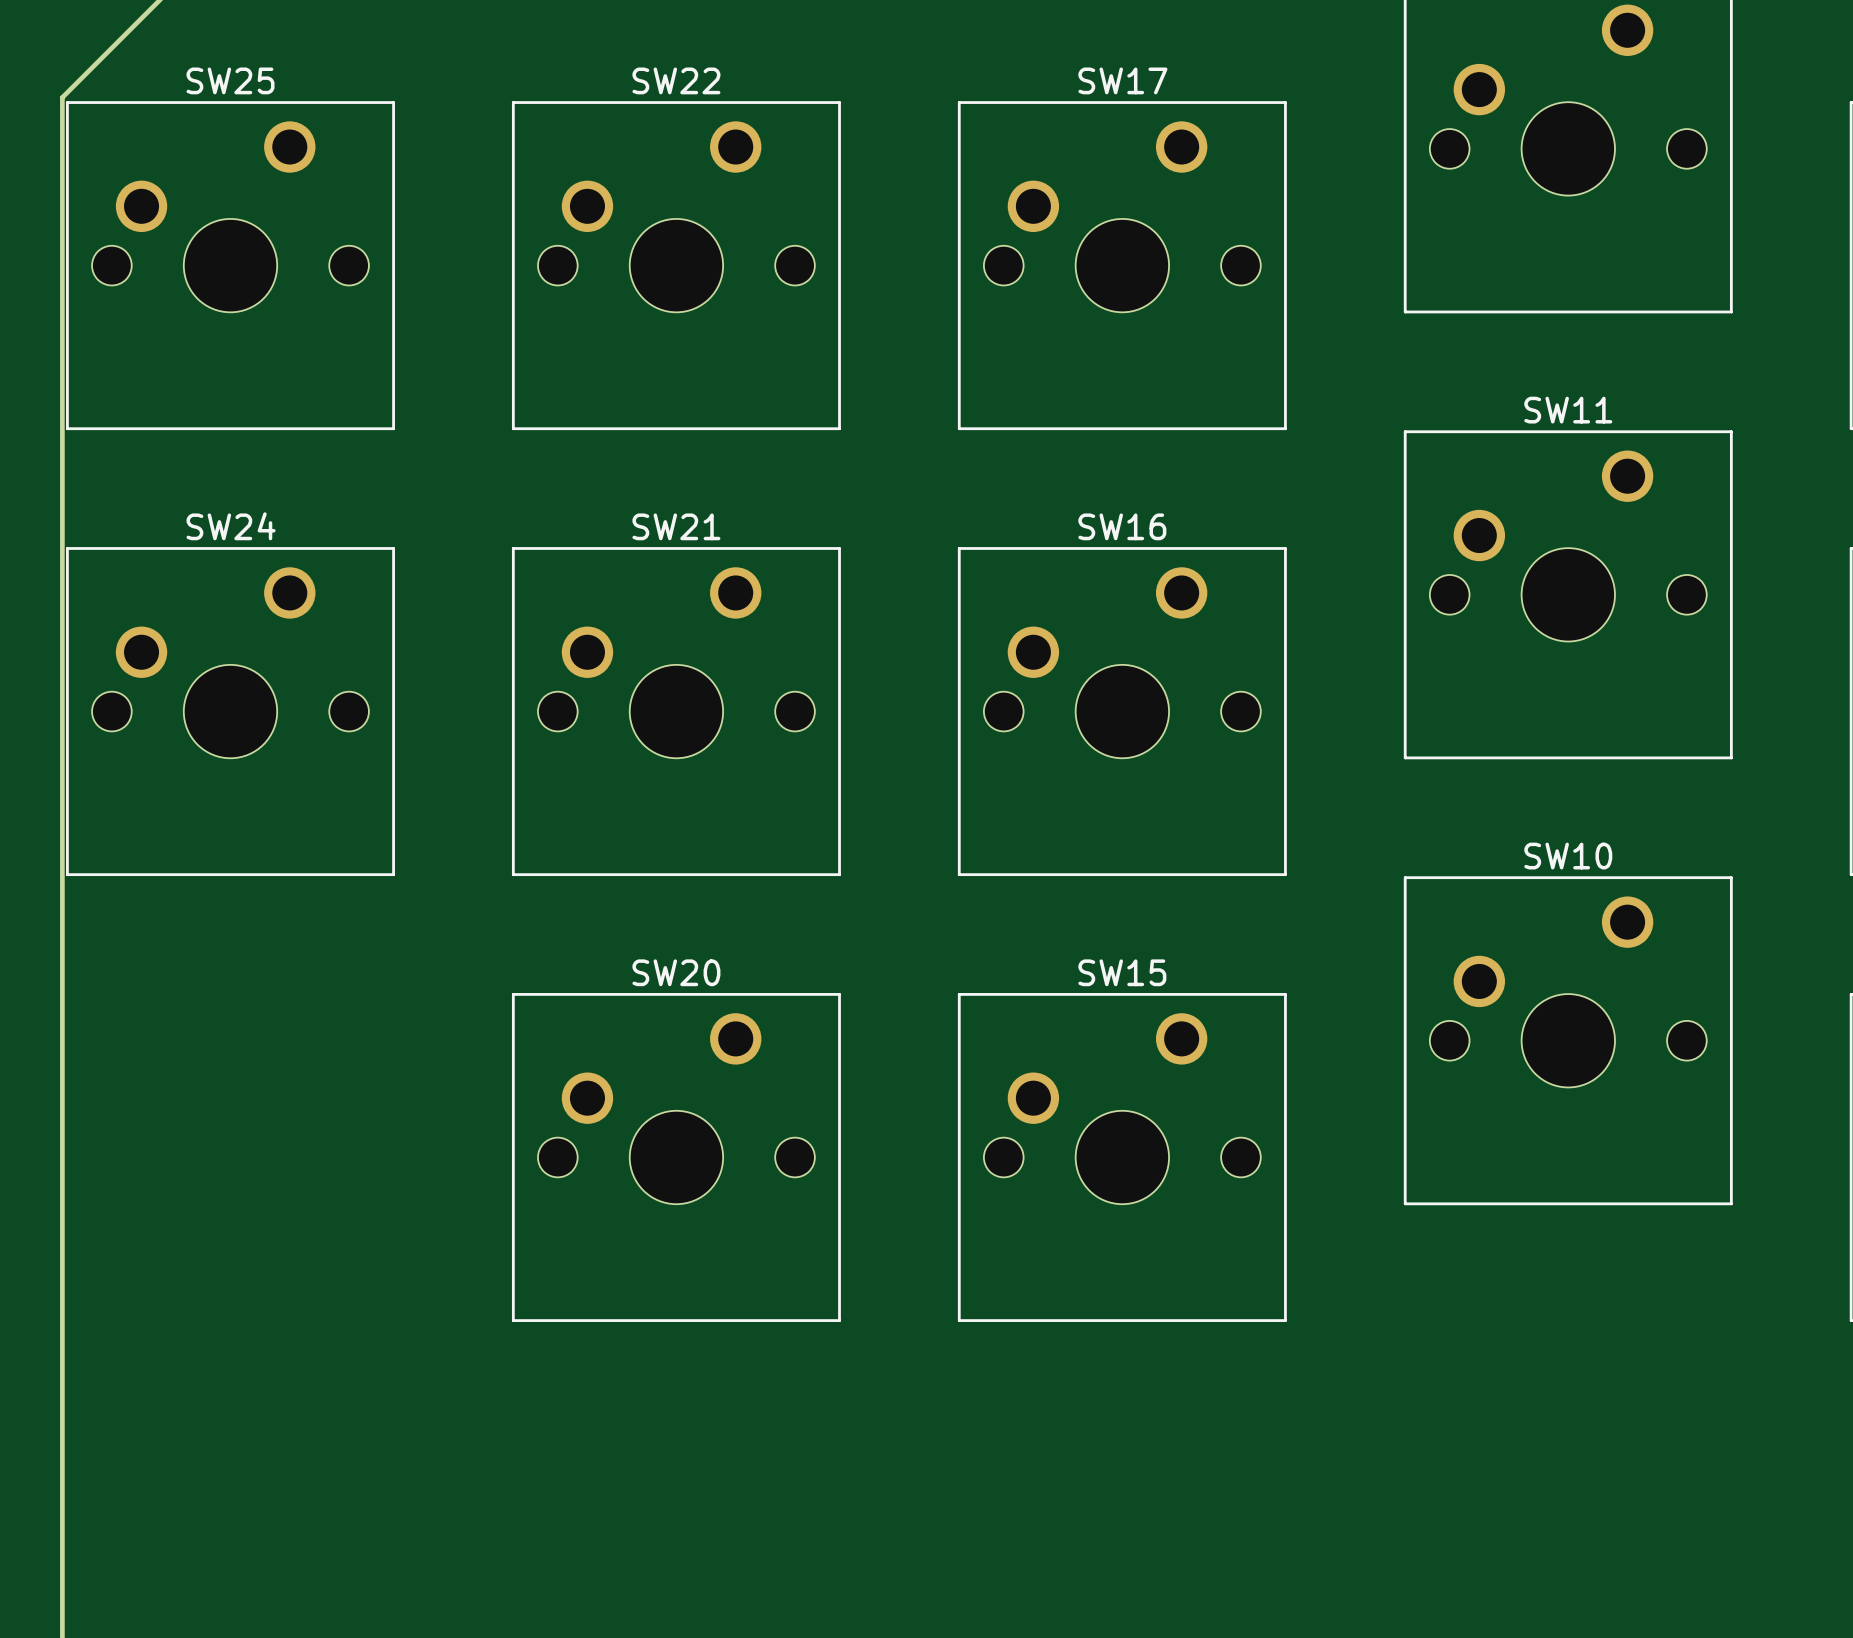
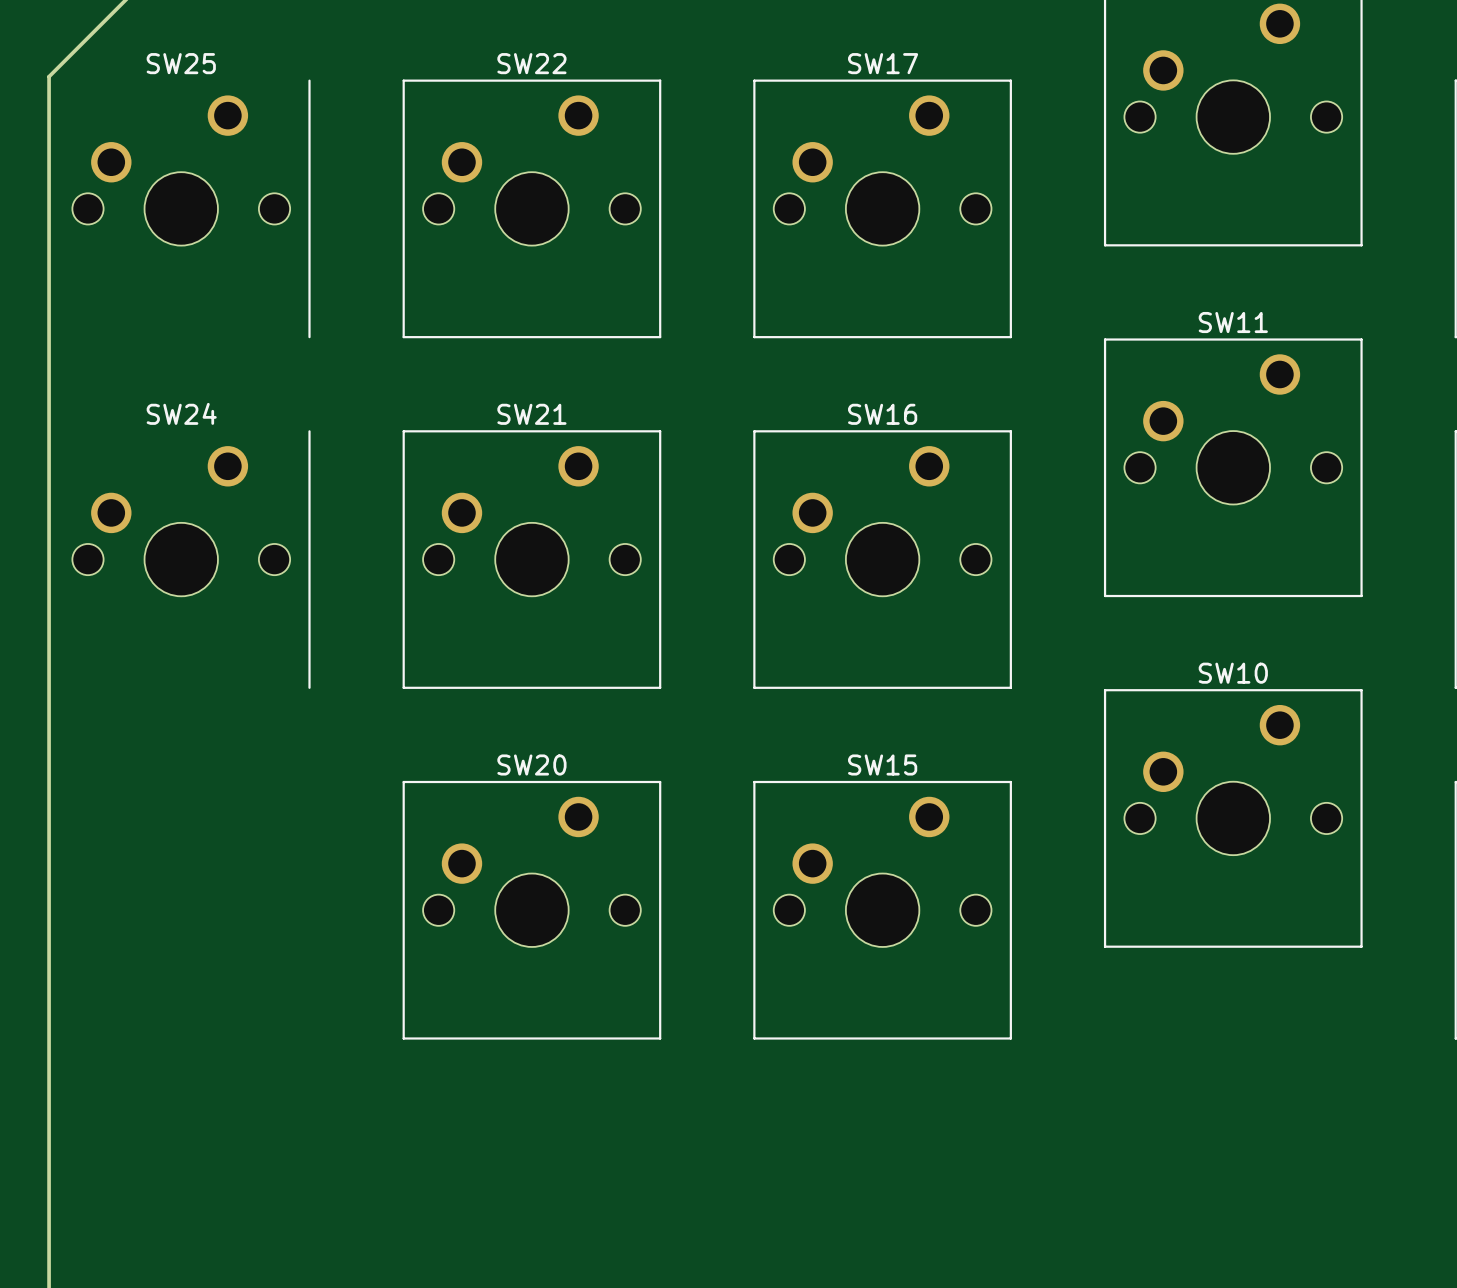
SW25 footprint: [66, 101, 395, 431] -> [72, 79, 311, 339]
SW24 footprint: [66, 547, 395, 877] -> [72, 430, 311, 689]

